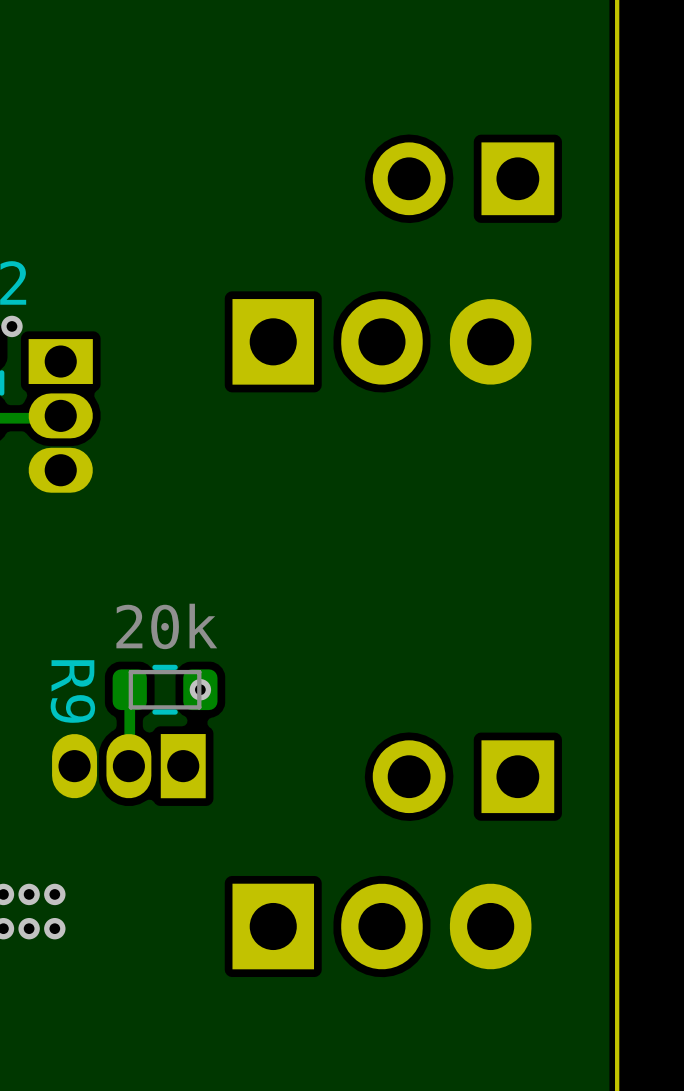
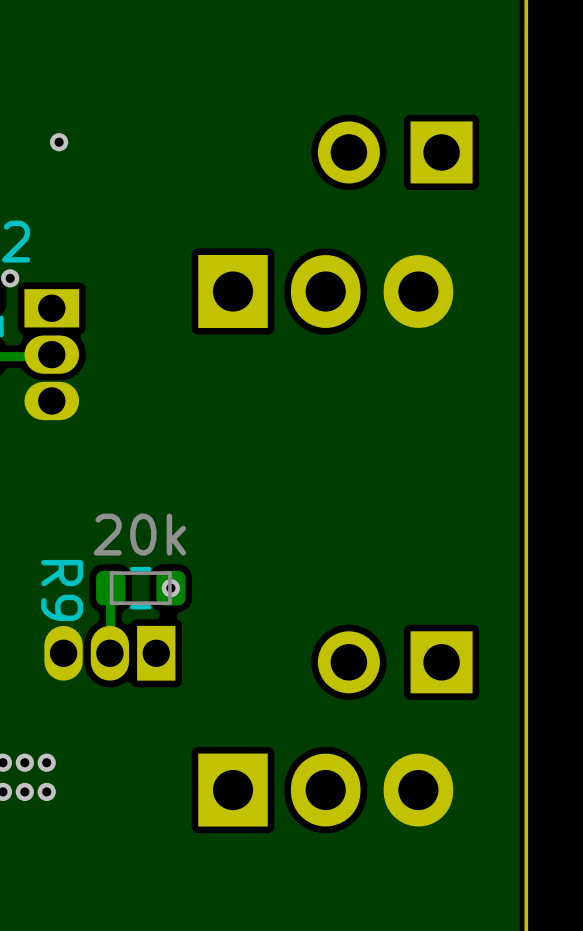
via: none -> (59, 142)

